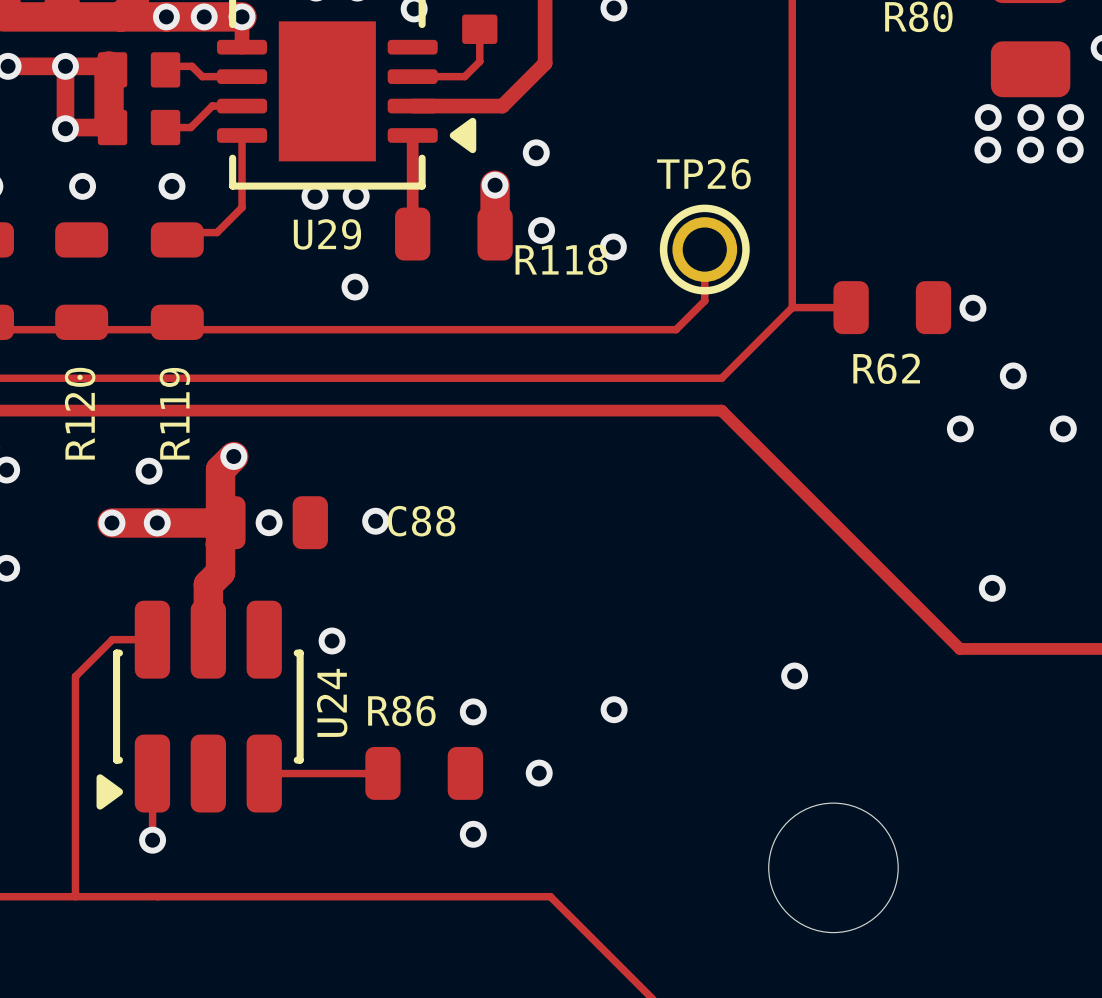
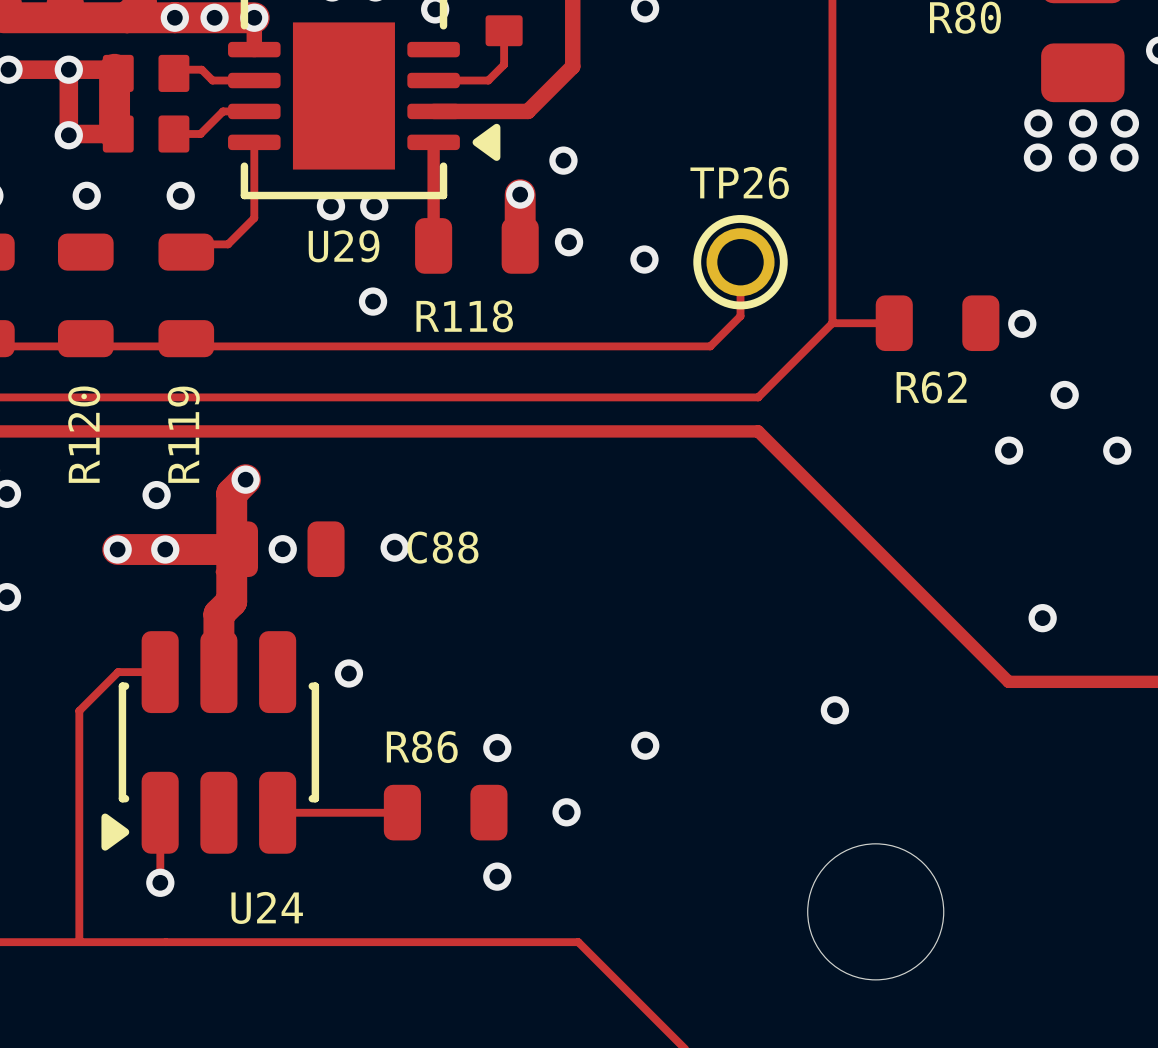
R118 name position: R118 (561, 259) -> R118 (464, 316)
U24 name rotation: 0° (332, 702) -> 90° clockwise (267, 907)
U24 name position: U24 (332, 702) -> U24 (267, 907)

